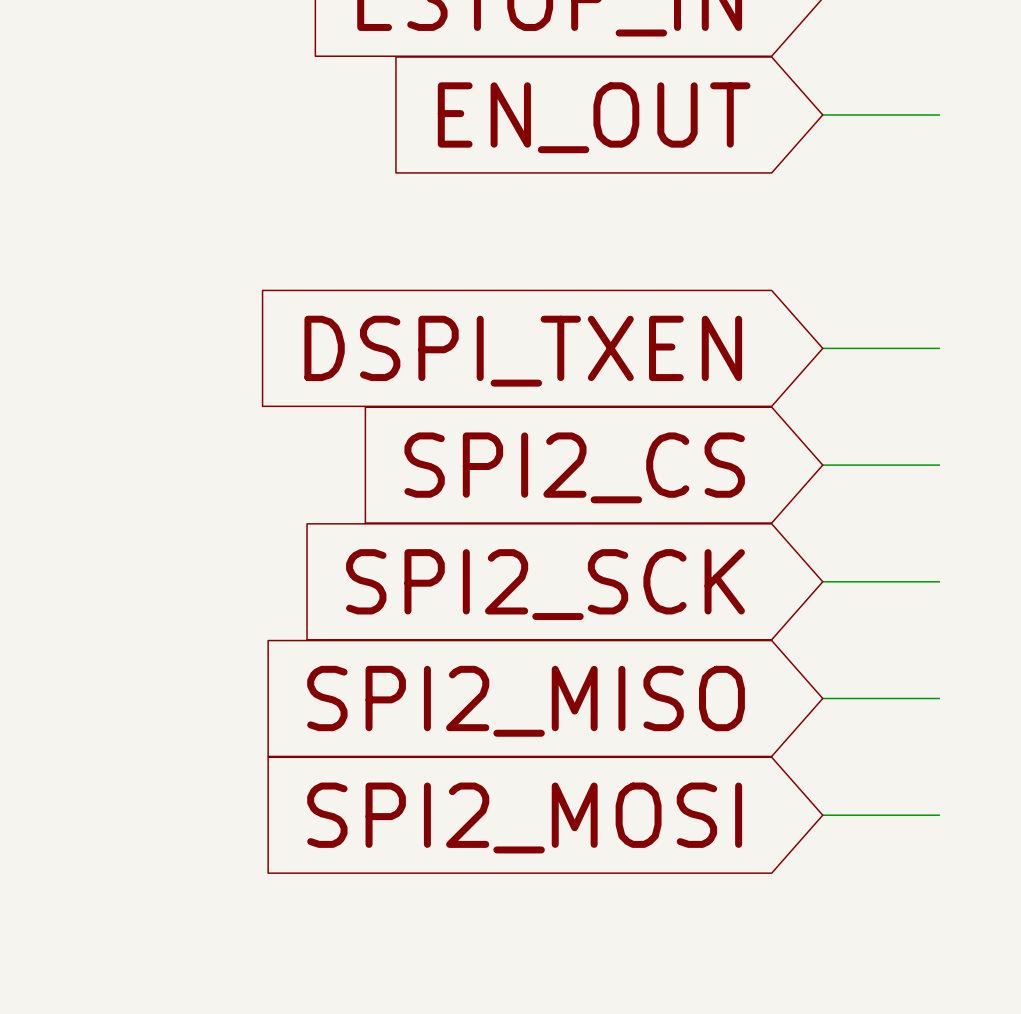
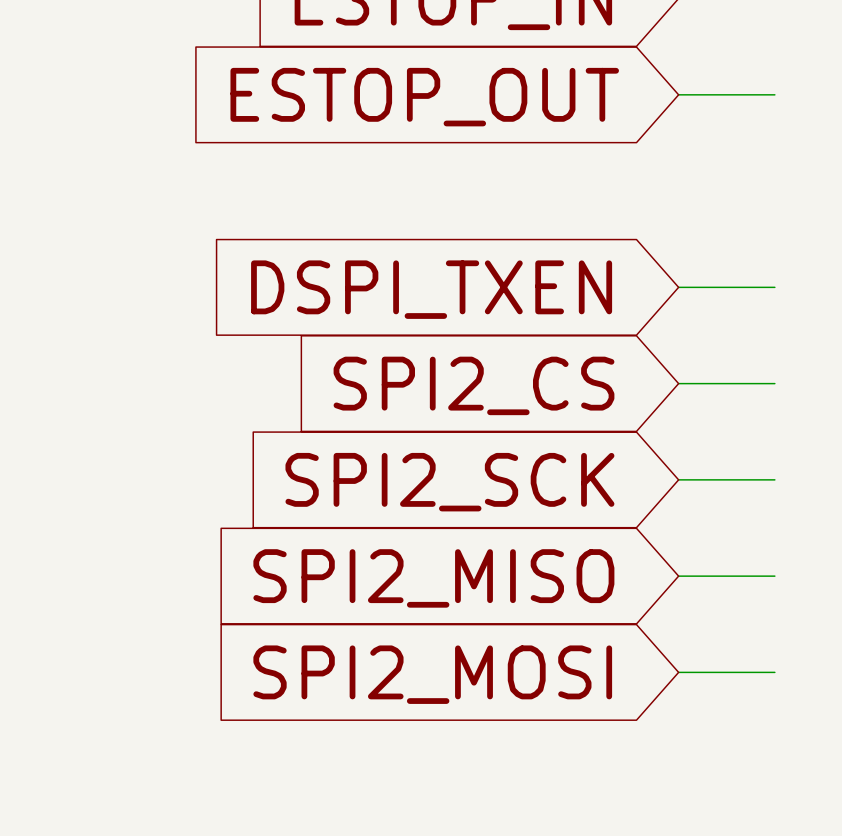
global label: EN_OUT (594, 117) -> ESTOP_OUT (424, 97)

